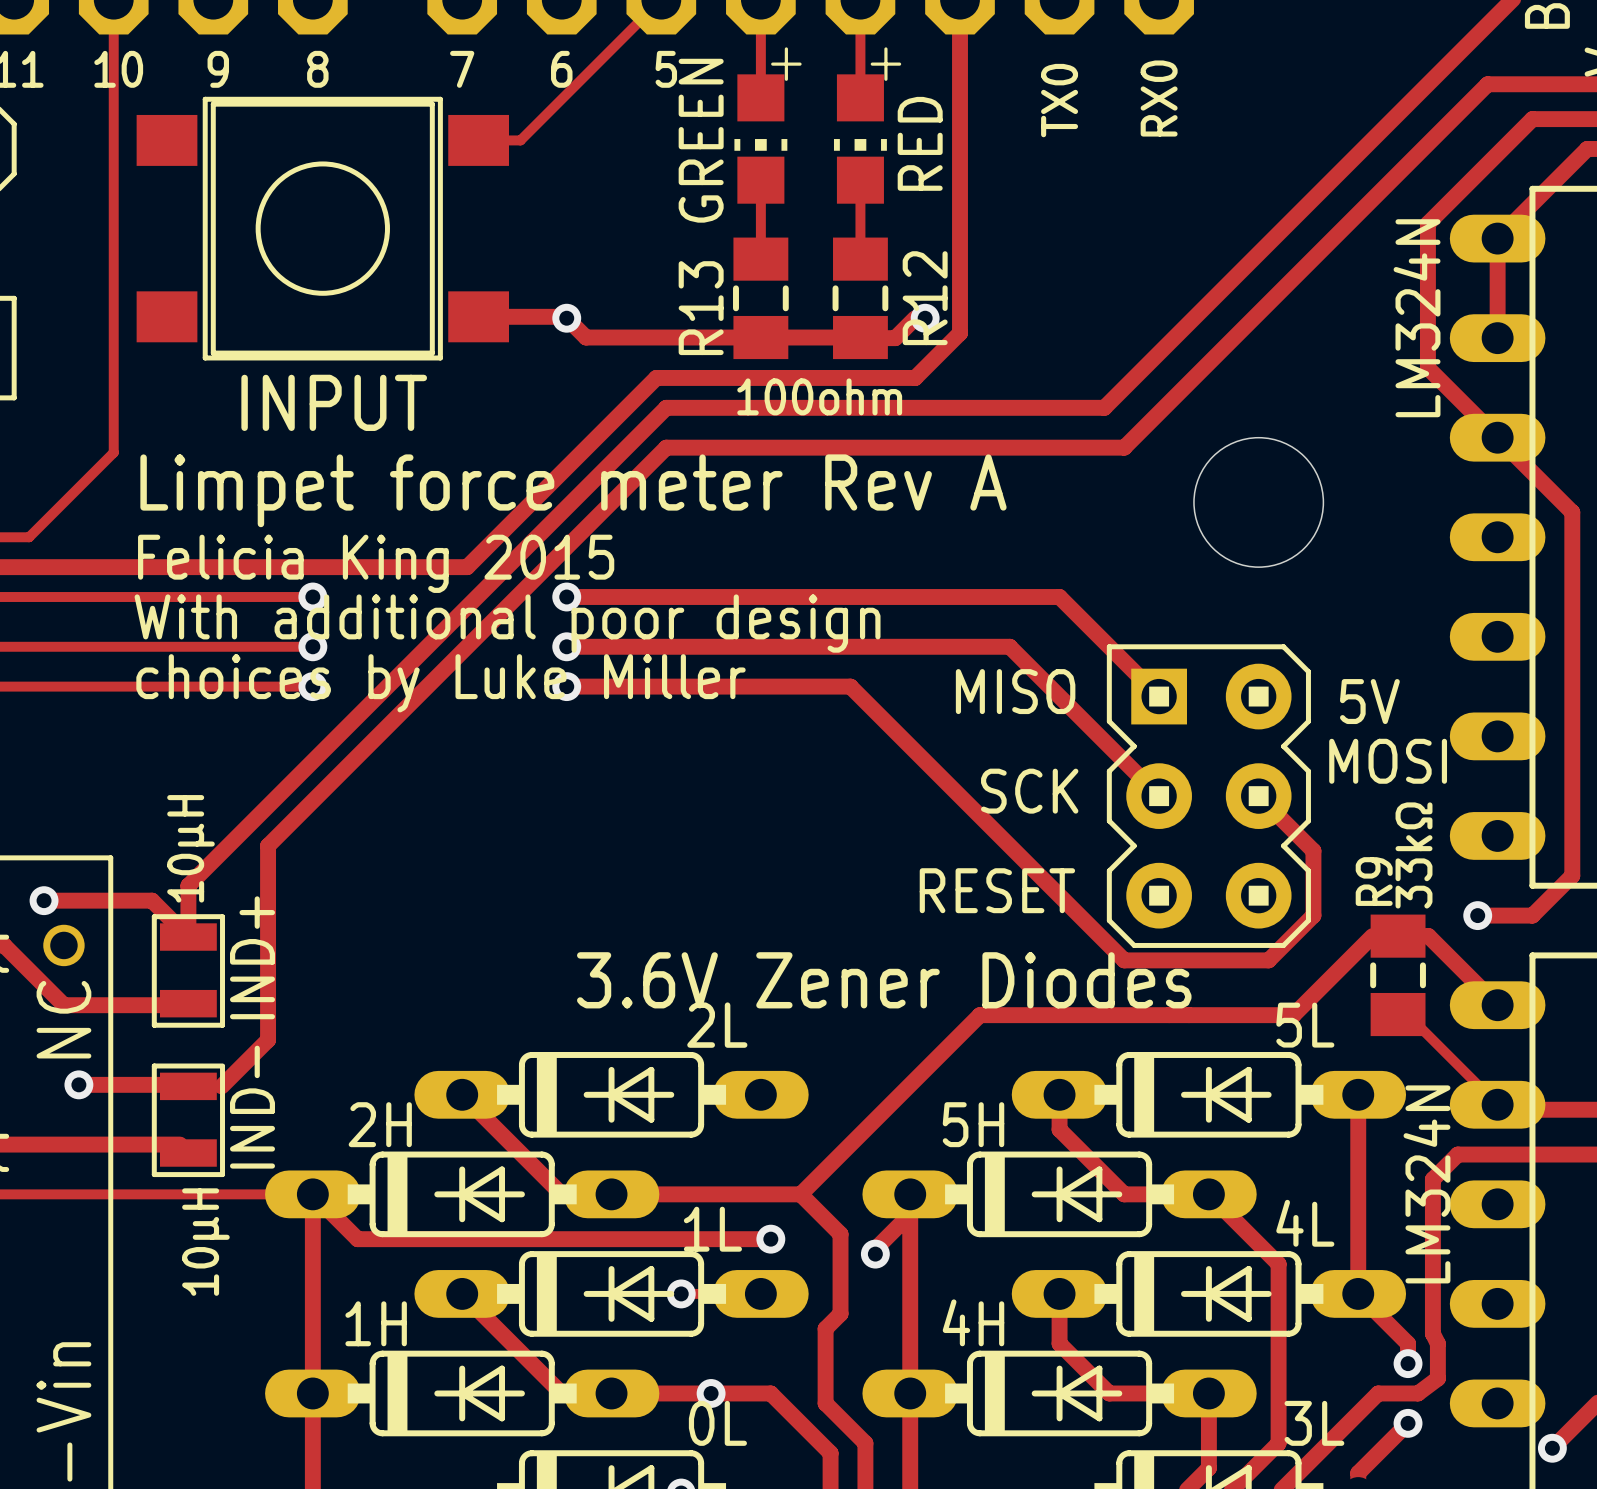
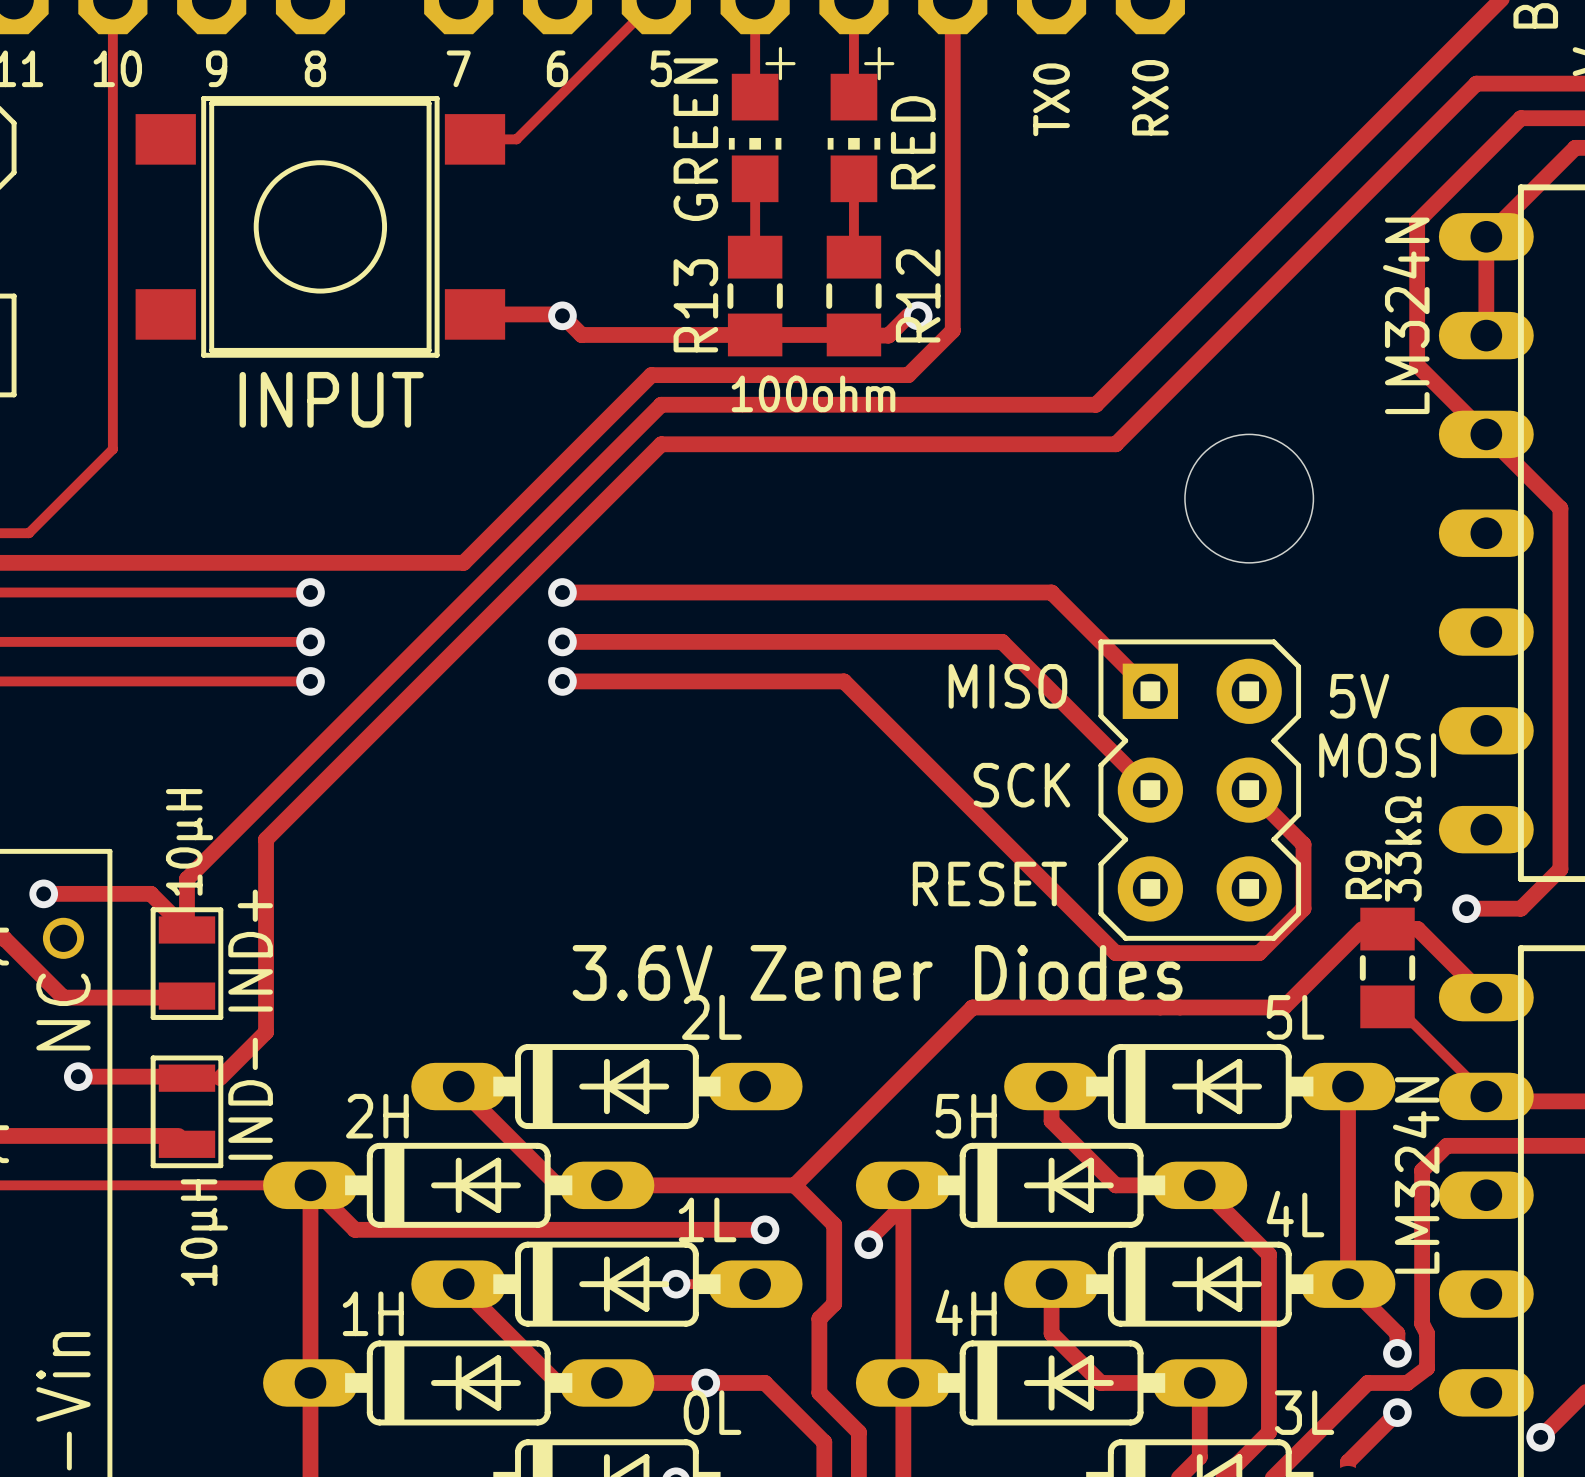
text: Limpet force meter Rev A (573, 490) -> none
text: Felicia King 2015 (376, 563) -> none
text: With additional poor design (507, 623) -> none
text: choices by Luke Miller (441, 683) -> none

